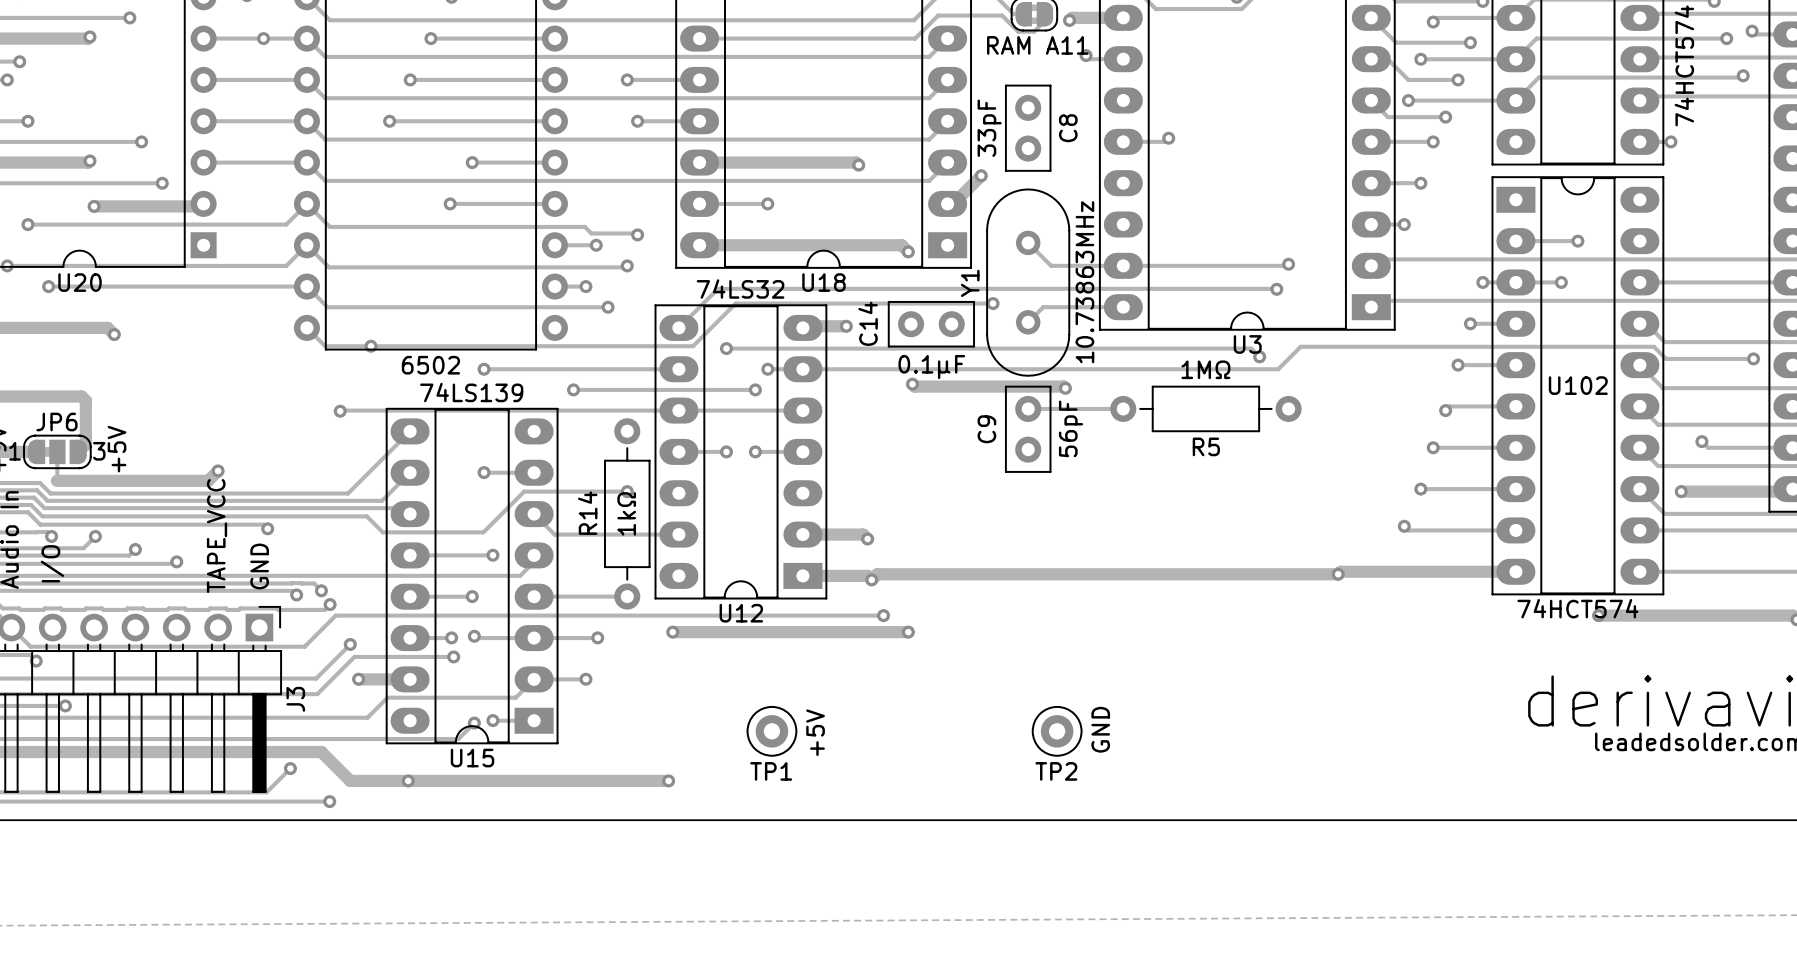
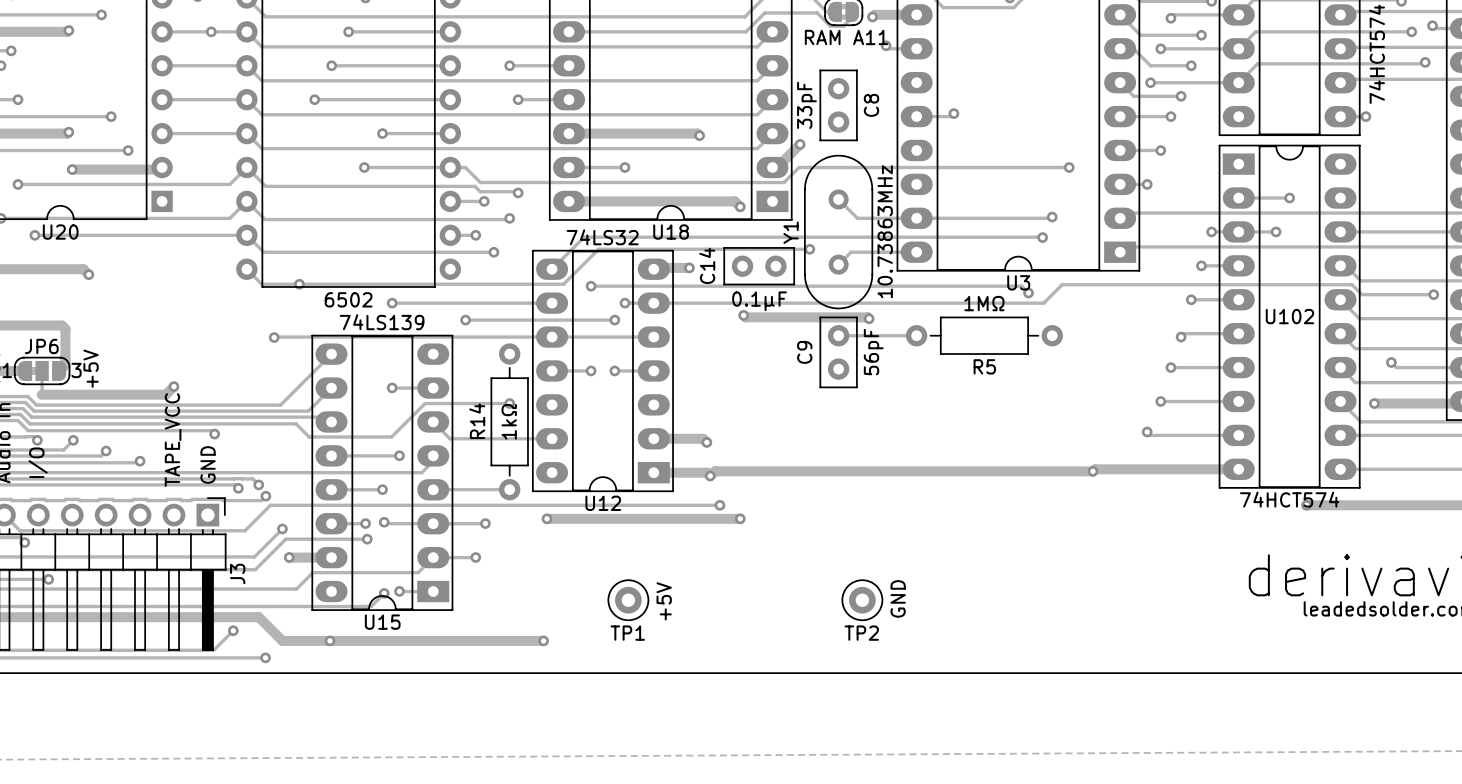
track: none -> (450, 167) (465, 167) (480, 182) (784, 182) (799, 167) (1069, 167)
via: none -> (1069, 167)

